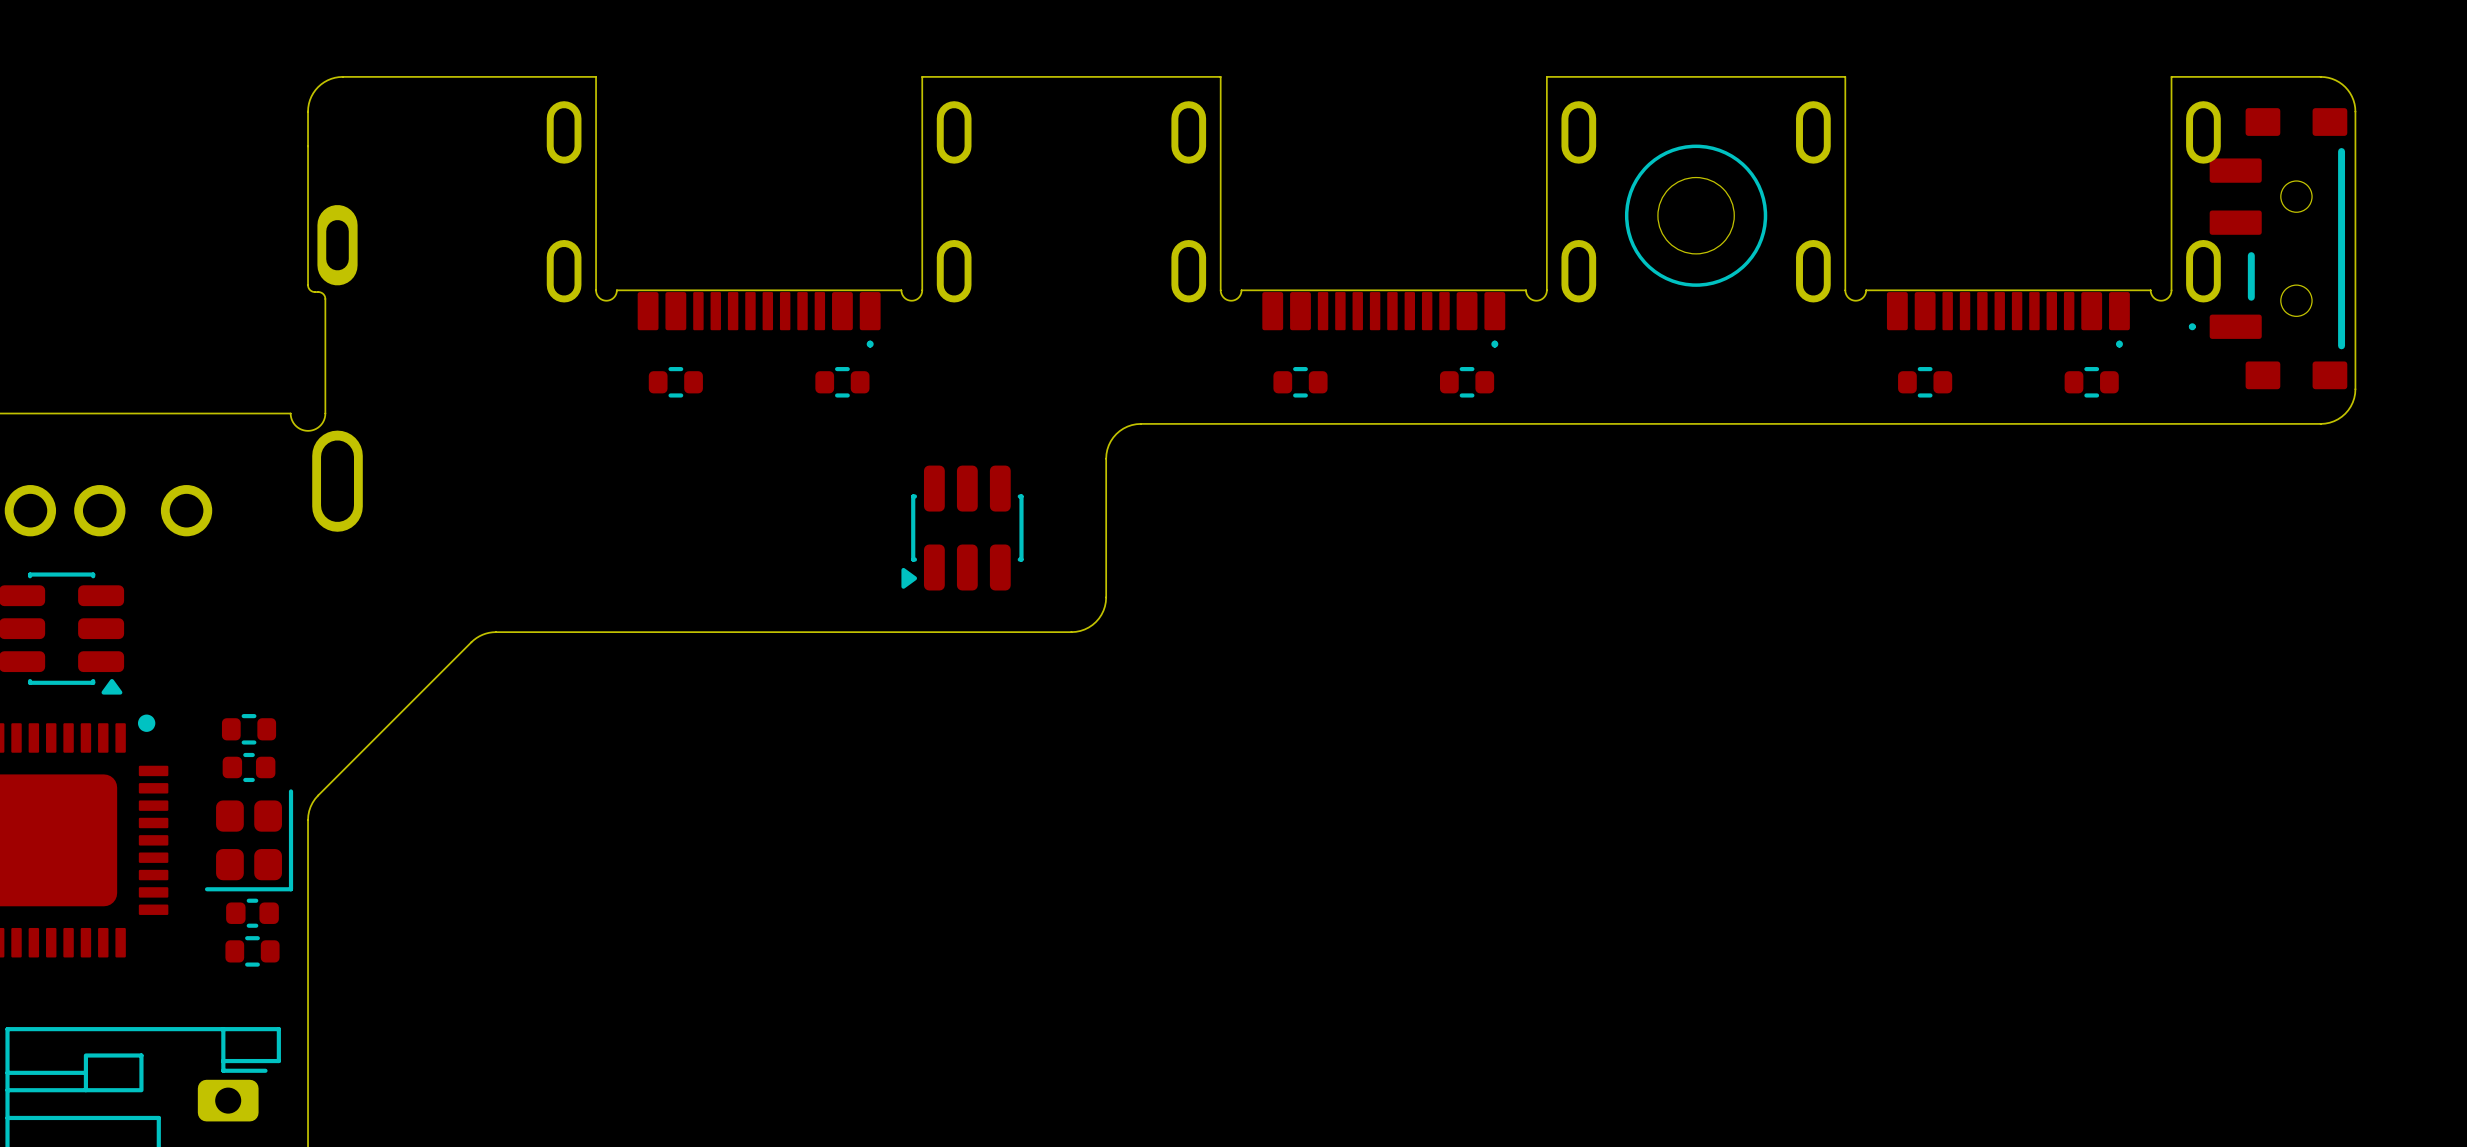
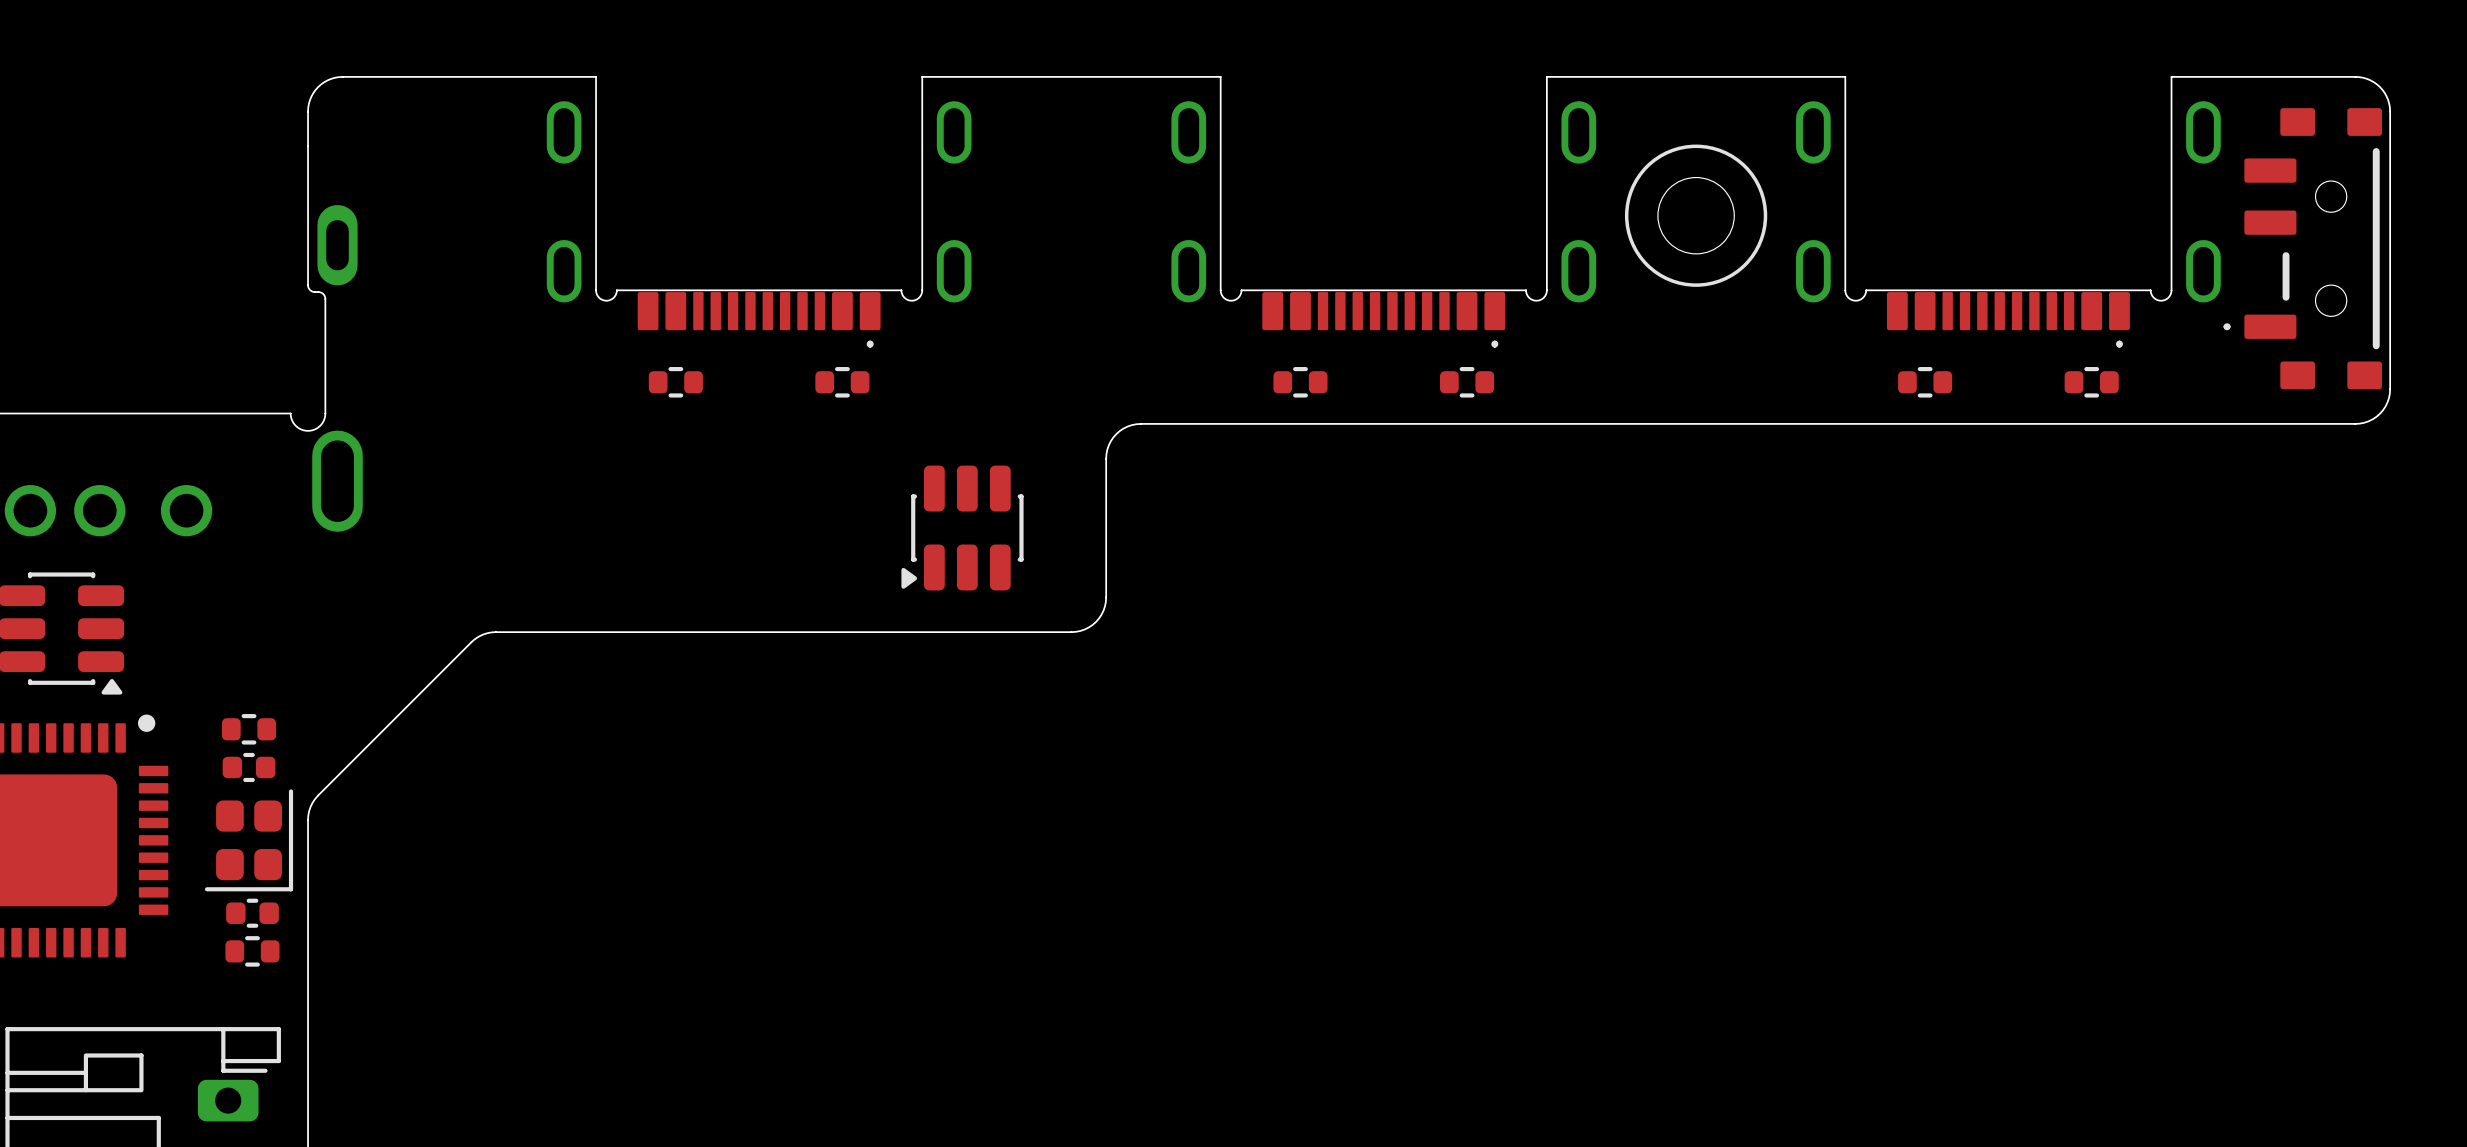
board edge: (2320, 76) (2332, 78) (2345, 87) (2353, 100) (2355, 111) (2355, 393) (2350, 406) (2341, 416) (2329, 422) (2320, 423) -> (2320, 76) (2359, 77) (2370, 80) (2384, 93) (2390, 111) (2388, 398) (2379, 413) (2368, 421) (2355, 423) (2320, 423)
part position: (2268, 248) -> (2302, 248)

